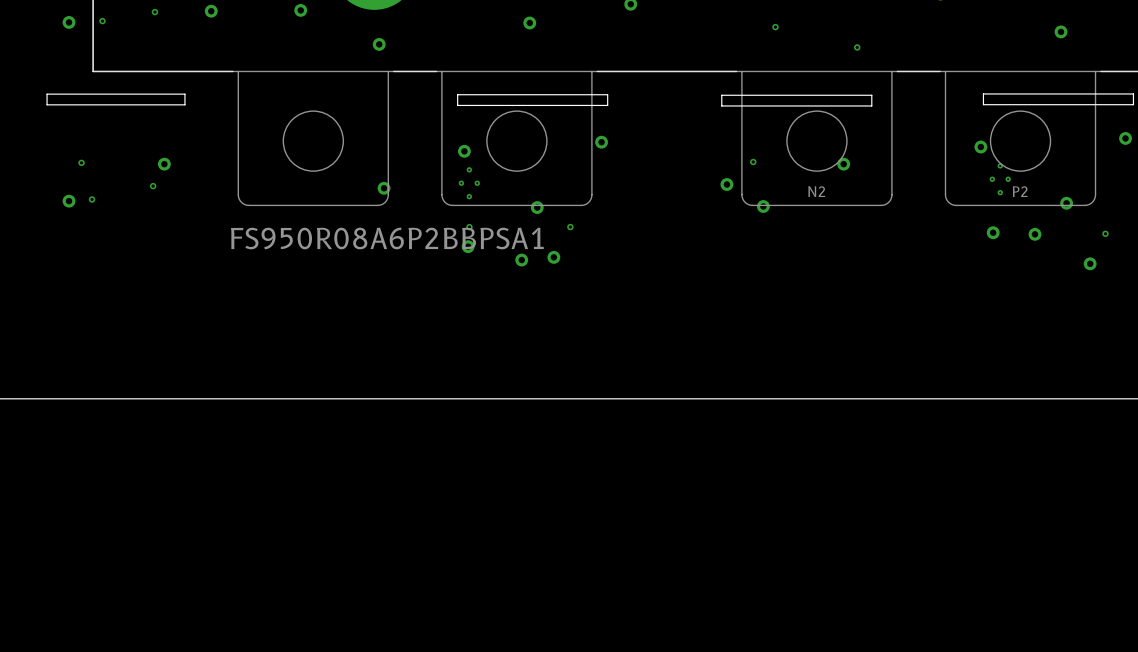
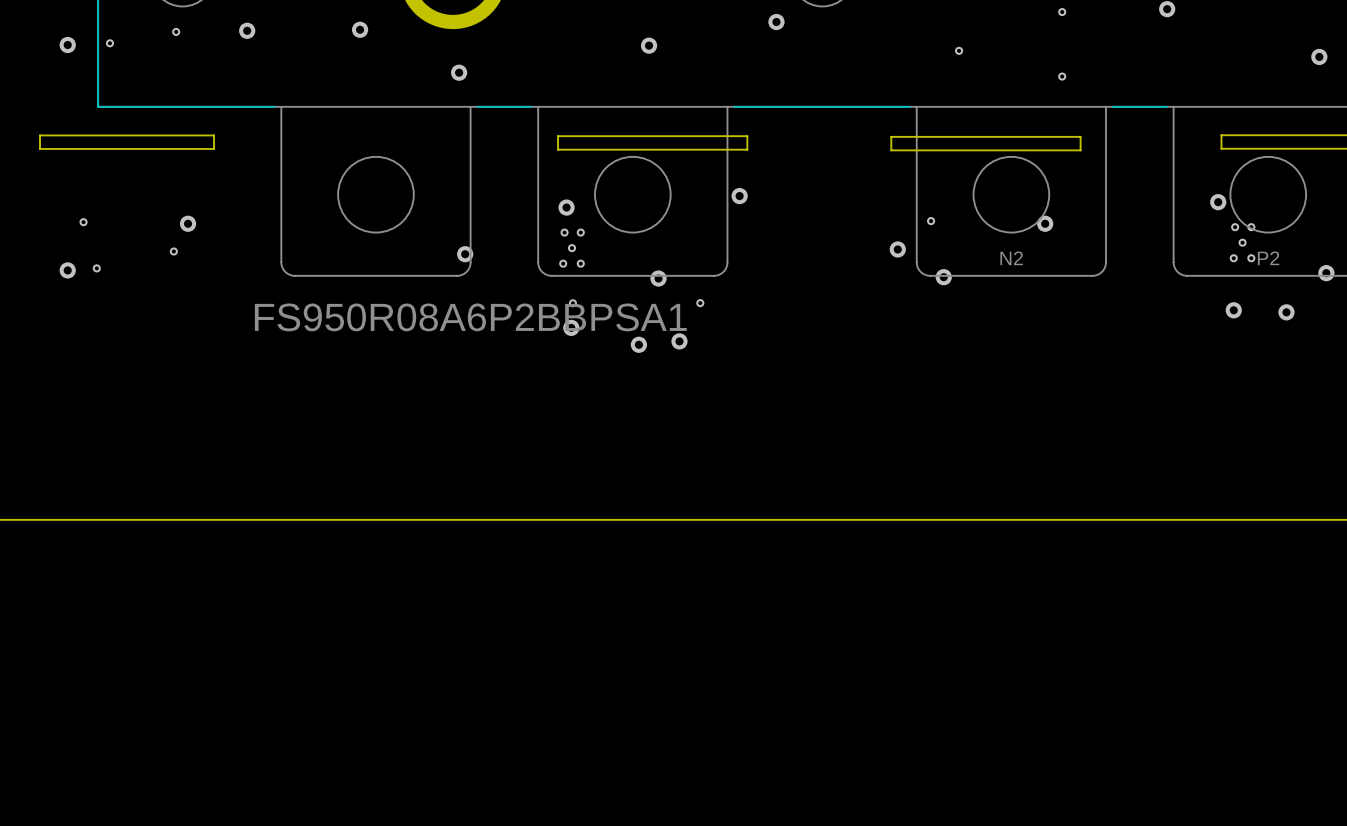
via: none -> (1235, 227)
via: none -> (1251, 227)
via: none -> (564, 232)
via: none -> (580, 232)
part: (1000, 179) -> none
via: none -> (1242, 242)
via: none -> (571, 248)
part: (469, 183) -> none
via: none -> (1233, 258)
via: none -> (1251, 258)
via: none -> (563, 263)
via: none -> (580, 263)

